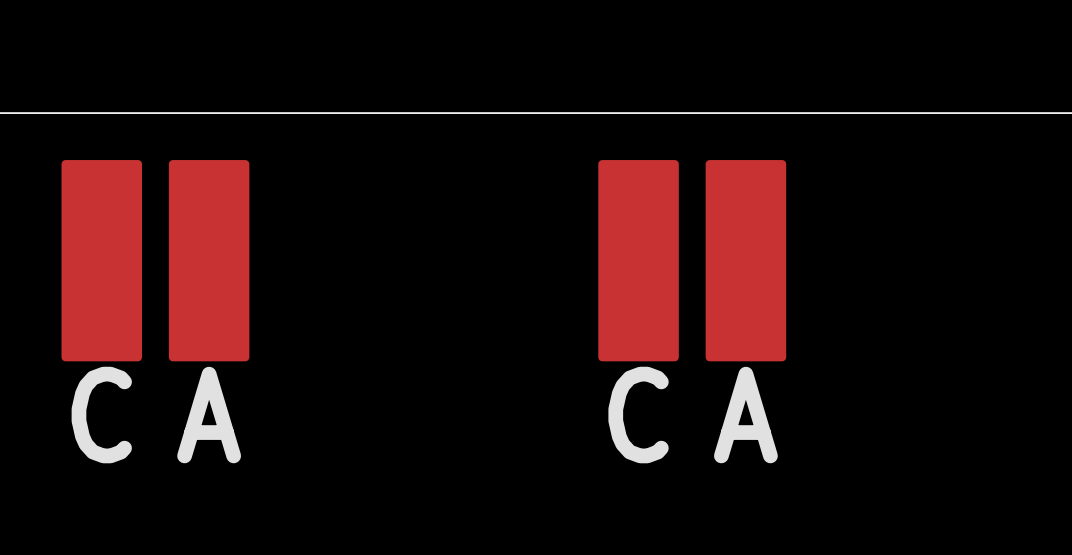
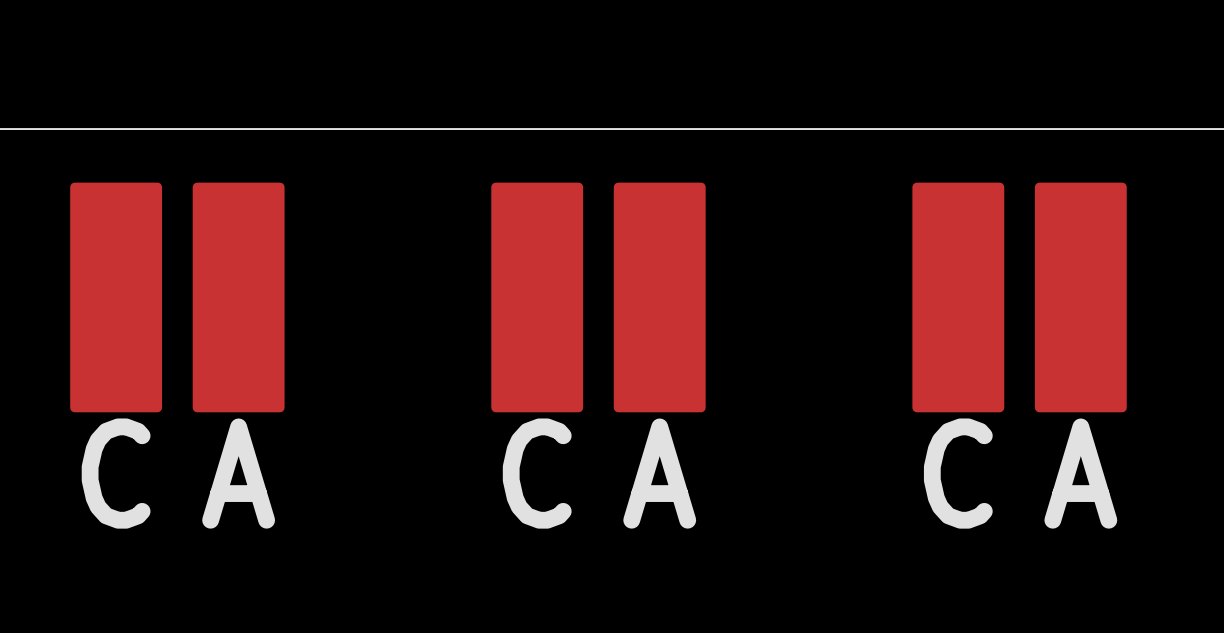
part: none -> (537, 297)
part position: (638, 260) -> (659, 297)
part position: (745, 260) -> (958, 297)
part: none -> (1080, 297)
text: none -> C (537, 473)
text: C (638, 415) -> A (659, 473)
text: A (745, 415) -> none
text: none -> C (958, 473)
text: none -> A (1080, 473)

